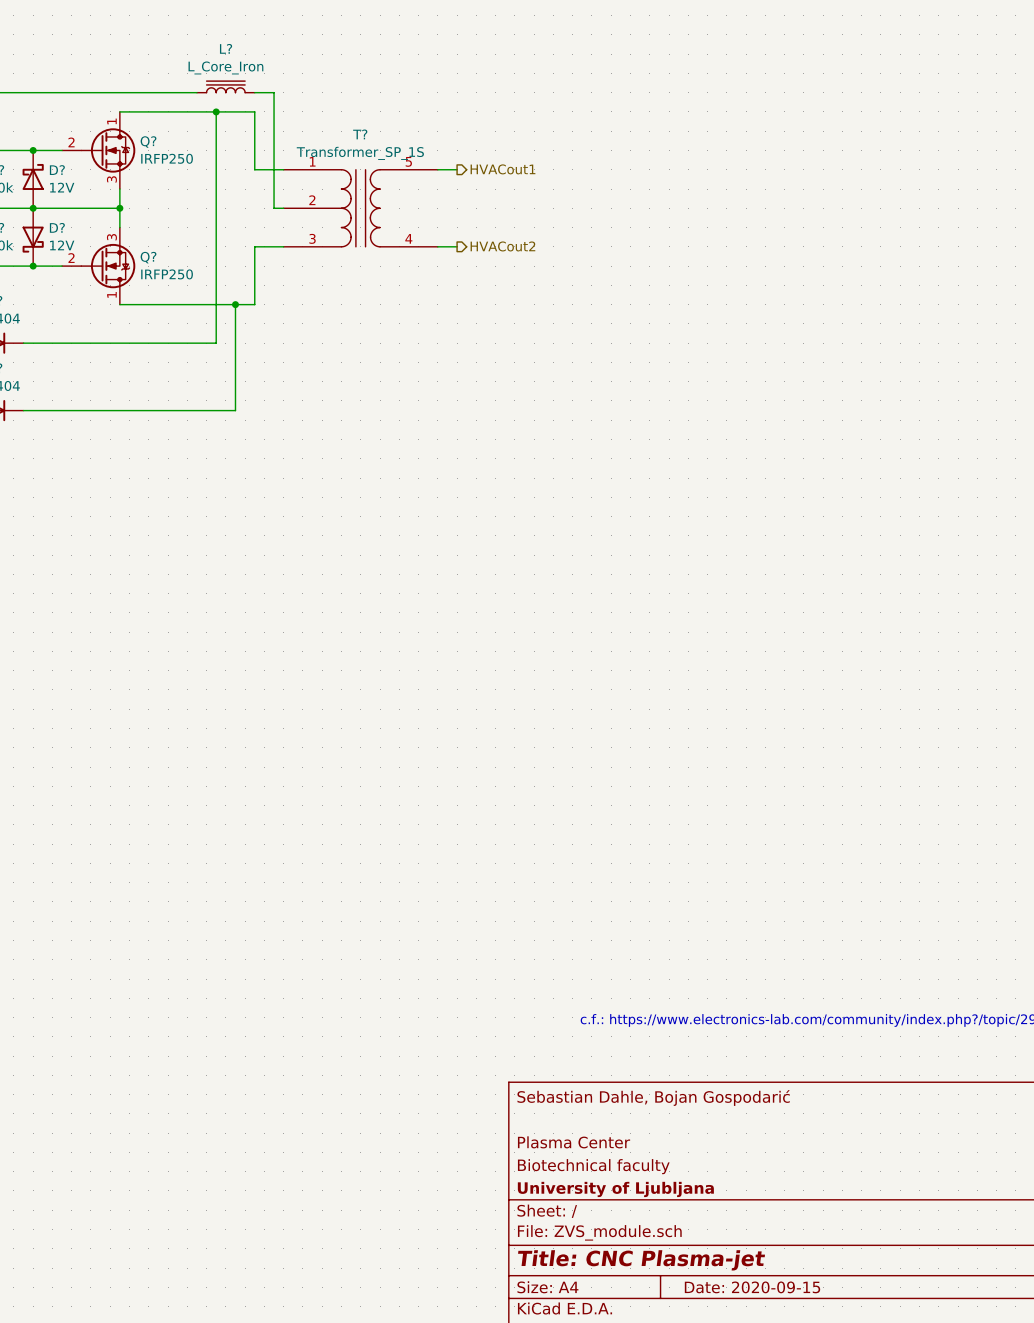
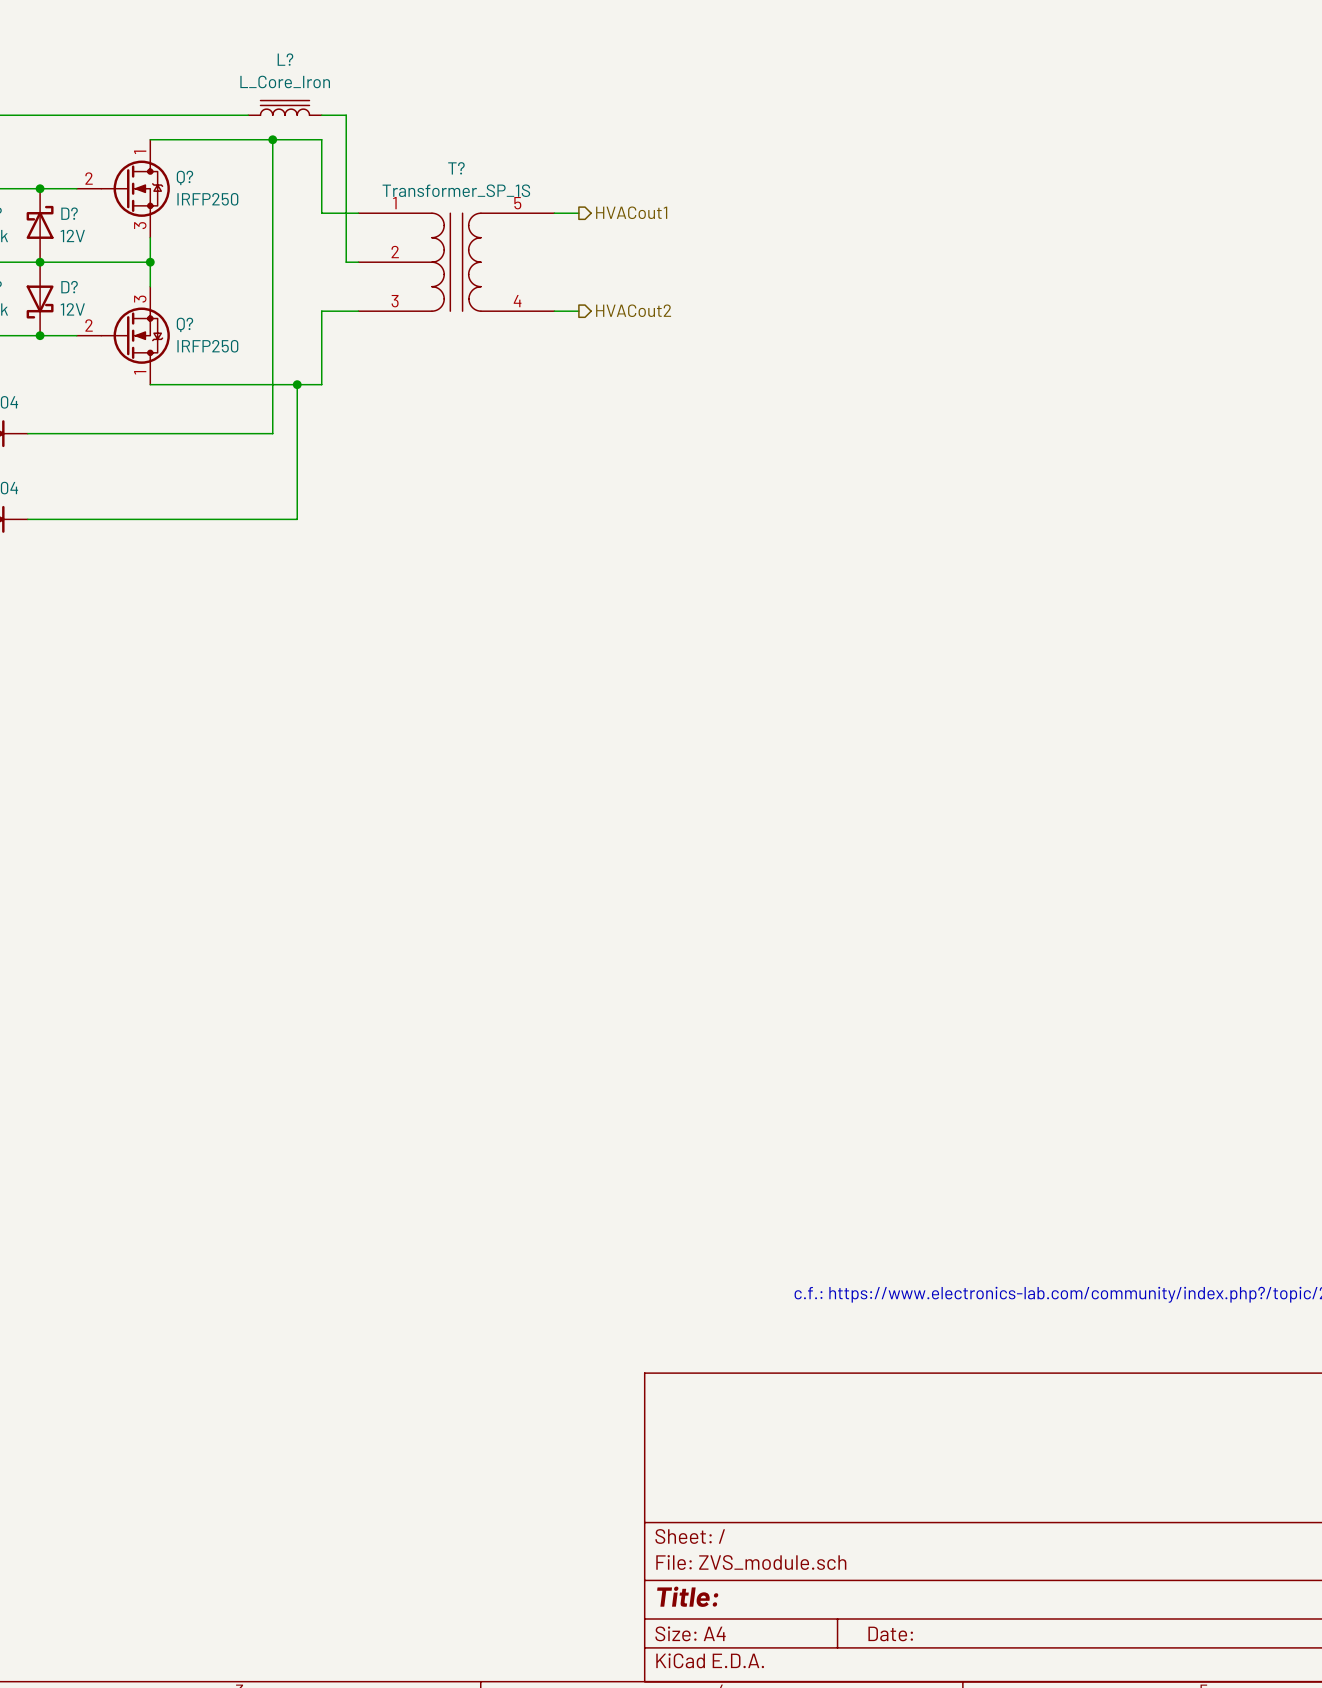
title block: Sebastian Dahle, Bojan Gospodarić (653, 1098) -> none
title block: Plasma Center (574, 1142) -> none
title block: Biotechnical faculty (593, 1166) -> none
title block: University of Ljubljana (615, 1189) -> none
title block: Title: CNC Plasma-jet (641, 1260) -> Title: (687, 1596)
title block: Date: 2020-09-15 (752, 1287) -> Date: (890, 1633)

